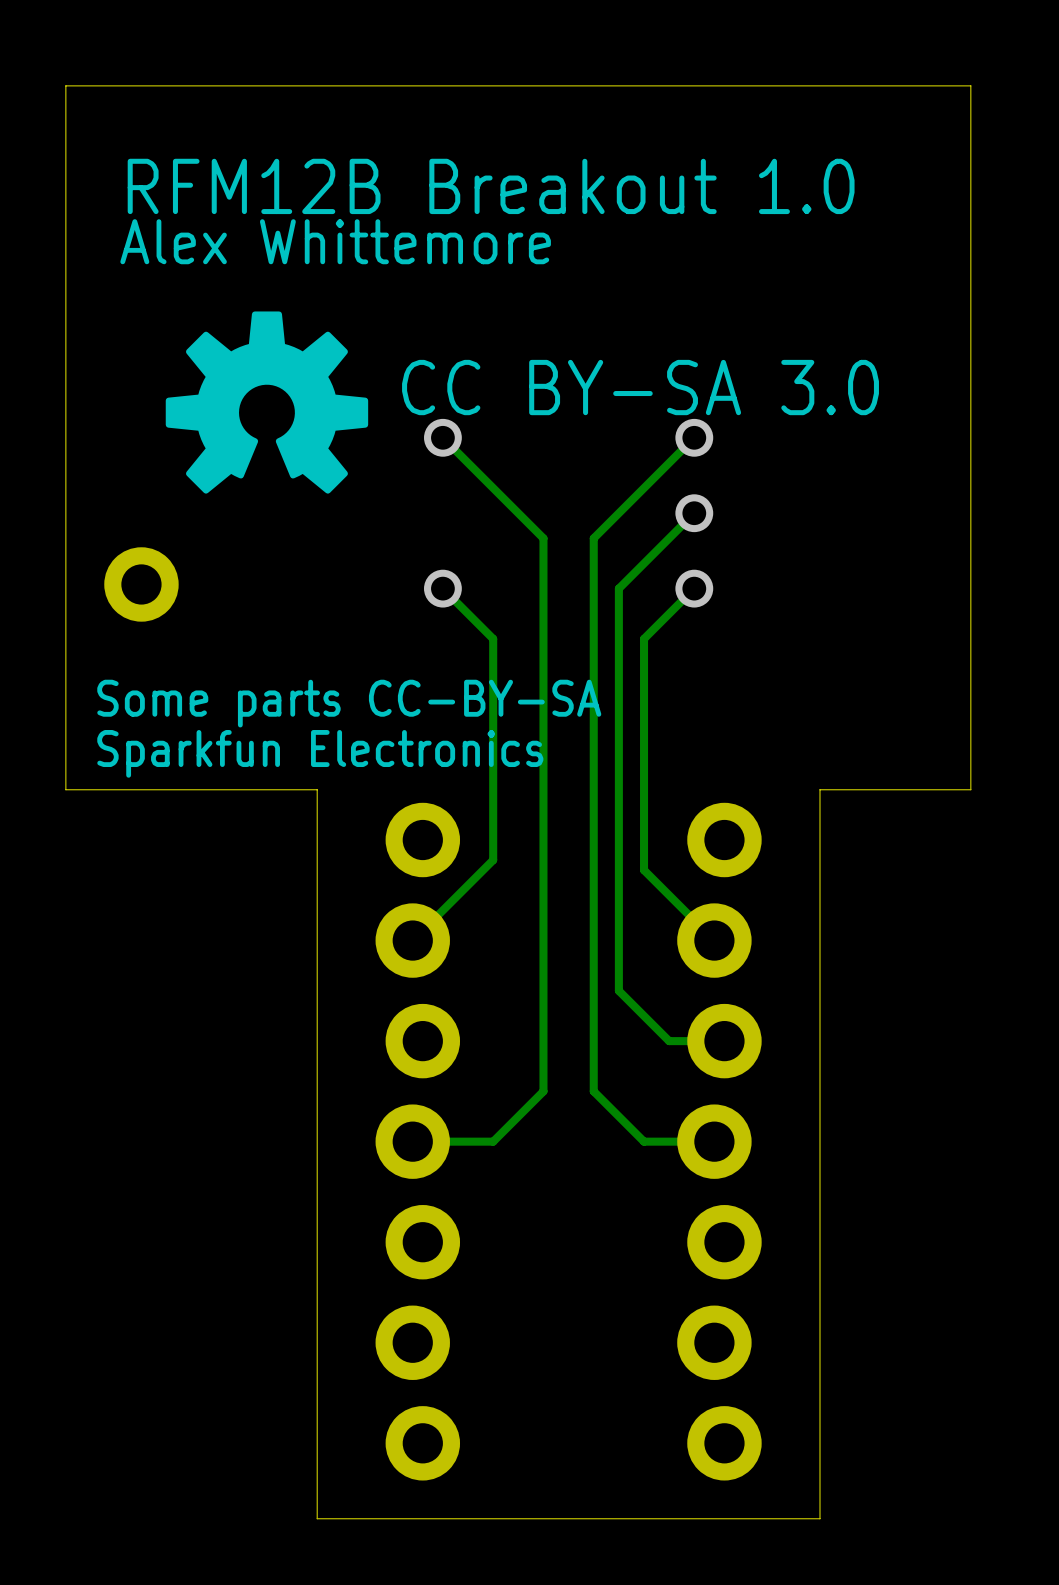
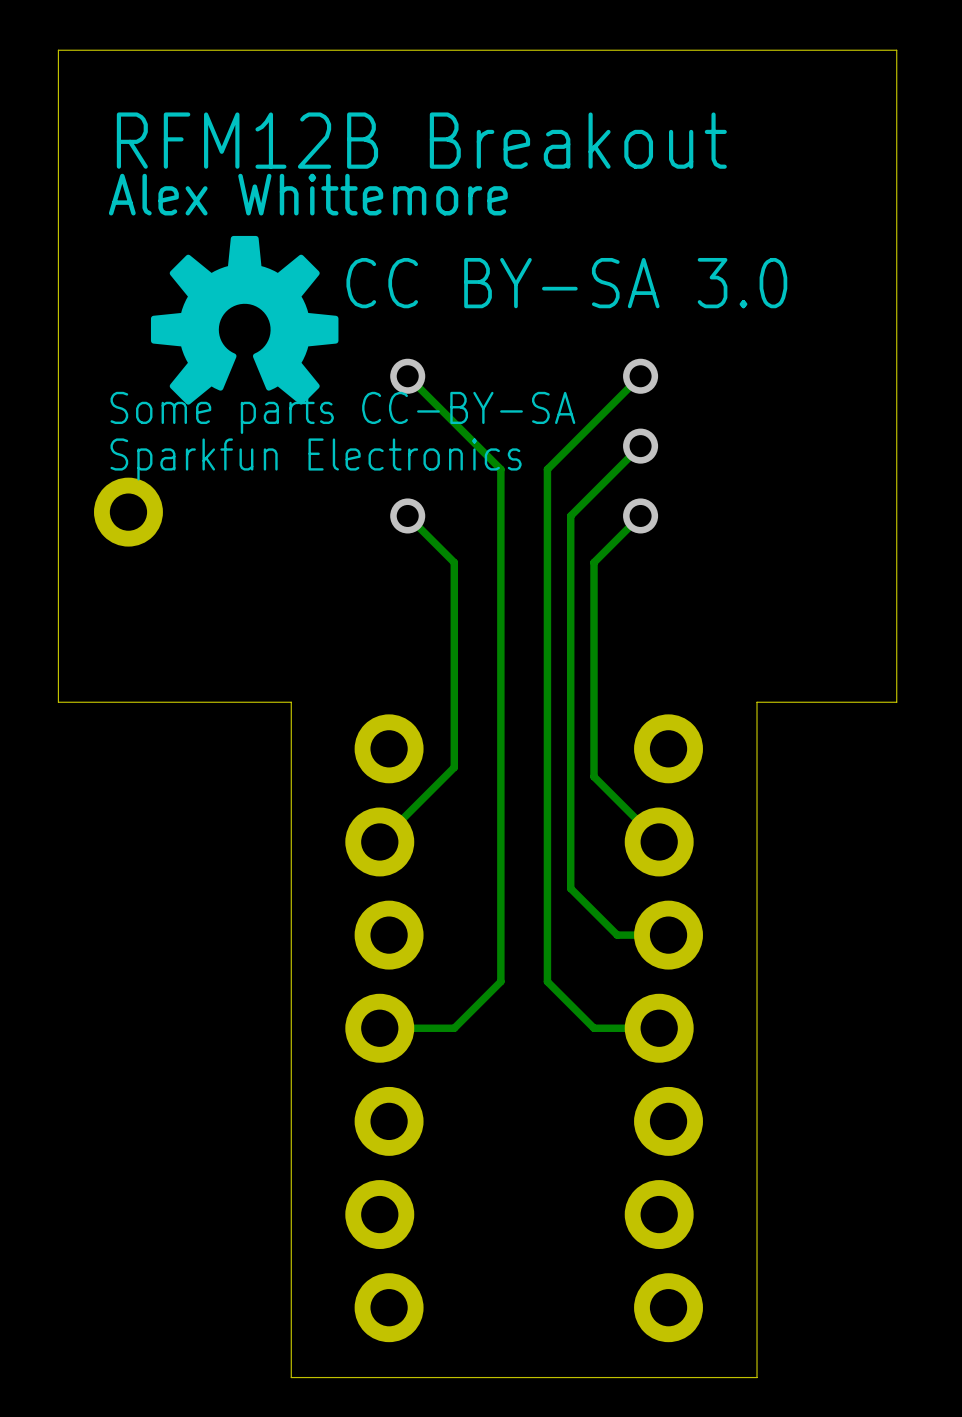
text: RFM12B Breakout 1.0 (491, 186) -> RFM12B Breakout (421, 140)
text position: CC BY-SA 3.0 (640, 387) -> CC BY-SA 3.0 (566, 283)
drawing position: (266, 402) -> (244, 320)
text position: Some parts CC-BY-SA (349, 703) -> Some parts CC-BY-SA (342, 412)
text position: Sparkfun Electronics (320, 753) -> Sparkfun Electronics (316, 459)

